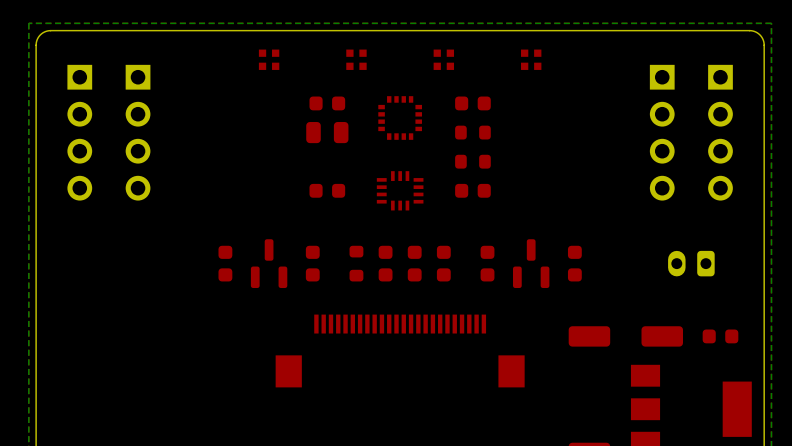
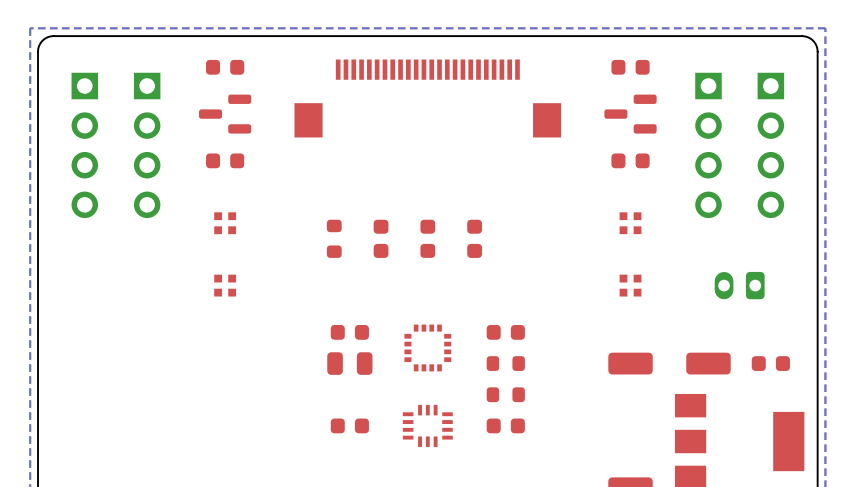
part: none -> (225, 67)
part: (269, 59) -> none
part: (356, 59) -> none
part: (443, 59) -> none
part: (531, 59) -> none
part: none -> (630, 67)
part: (327, 103) -> none
part: (472, 103) -> none
part position: (400, 118) -> (427, 347)
part position: (327, 132) -> (349, 363)
part: (472, 132) -> none
part: none -> (225, 160)
part: none -> (630, 160)
part: (472, 161) -> none
part: (327, 190) -> none
part position: (400, 190) -> (427, 425)
part: (472, 190) -> none
part: none -> (225, 223)
part: none -> (630, 223)
part: none -> (381, 238)
part: none -> (427, 238)
part: none -> (474, 238)
part footprint: [218, 245, 233, 282] -> [214, 274, 237, 297]
part footprint: [567, 245, 582, 282] -> [619, 274, 642, 297]
part rotation: 0° (269, 263) -> 90° counterclockwise (225, 114)
part position: (269, 263) -> (225, 114)
part: (312, 263) -> none
part position: (356, 263) -> (334, 238)
part: (385, 263) -> none
part: (414, 263) -> none
part: (443, 263) -> none
part: (487, 263) -> none
part rotation: 0° (531, 263) -> 90° counterclockwise (630, 114)
part position: (531, 263) -> (630, 114)
part: none -> (349, 332)
part: none -> (505, 332)
part: none -> (505, 363)
part position: (400, 350) -> (427, 98)
part: none -> (505, 394)
part: none -> (349, 425)
part: none -> (505, 425)

